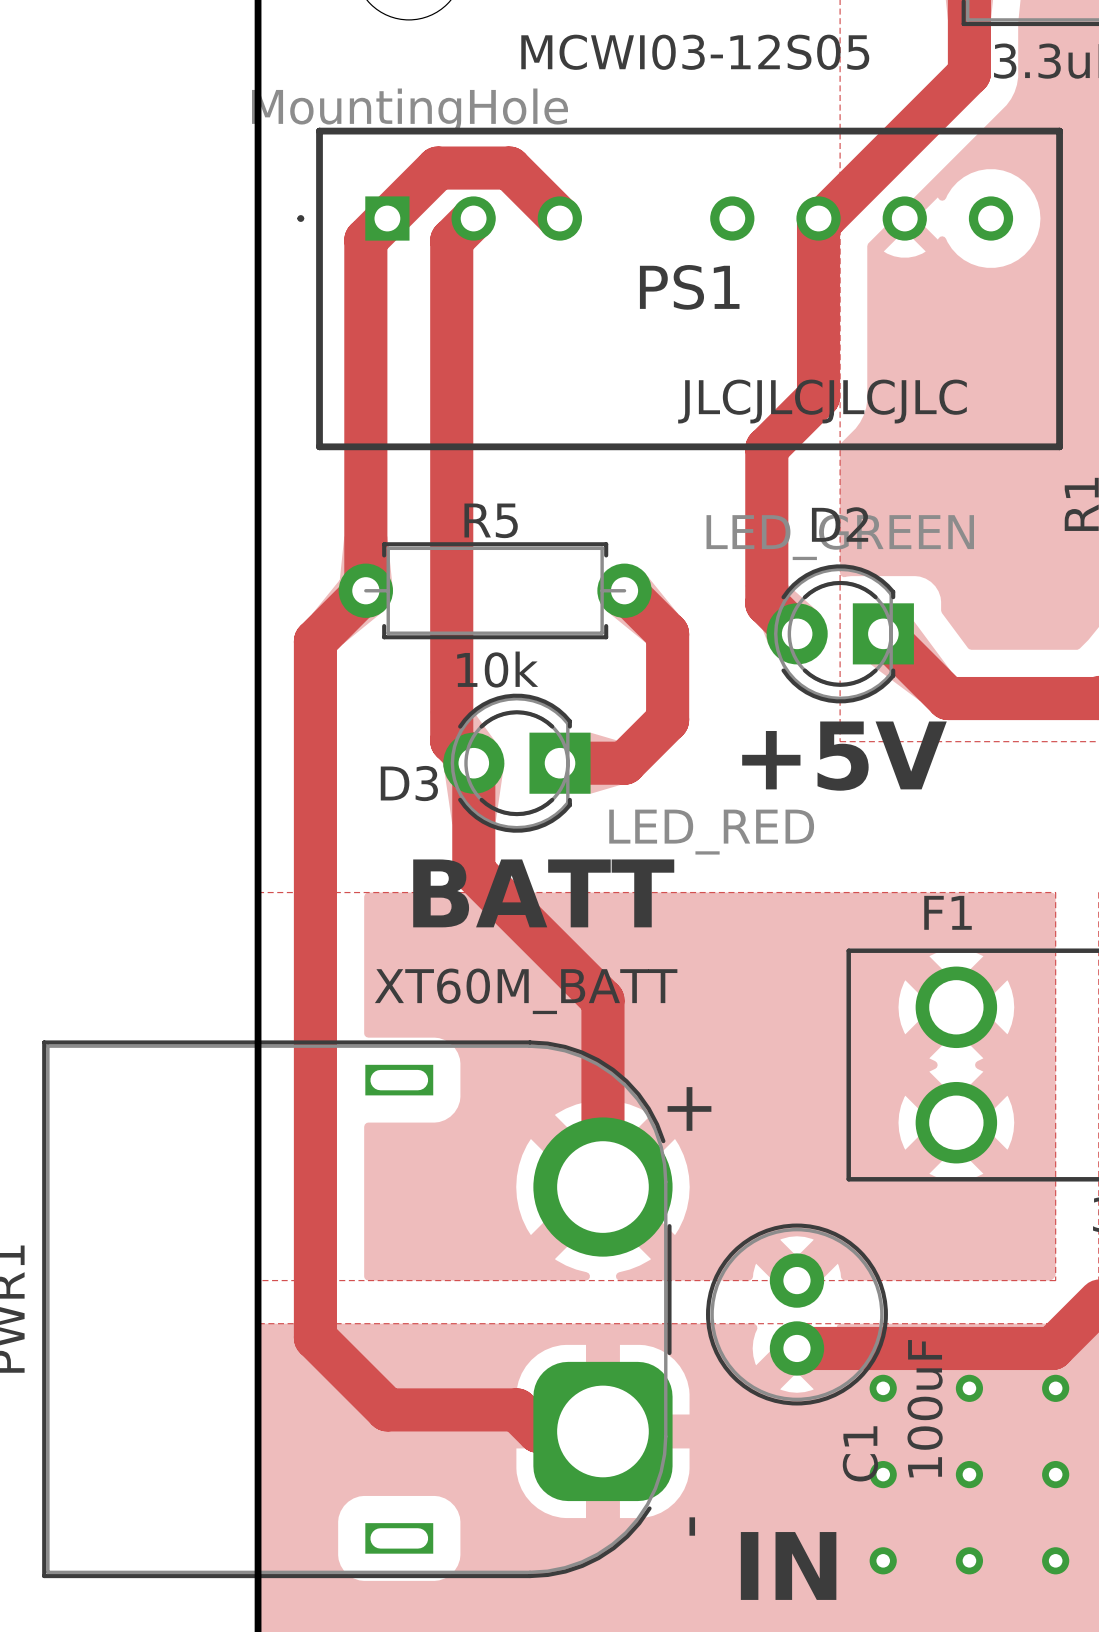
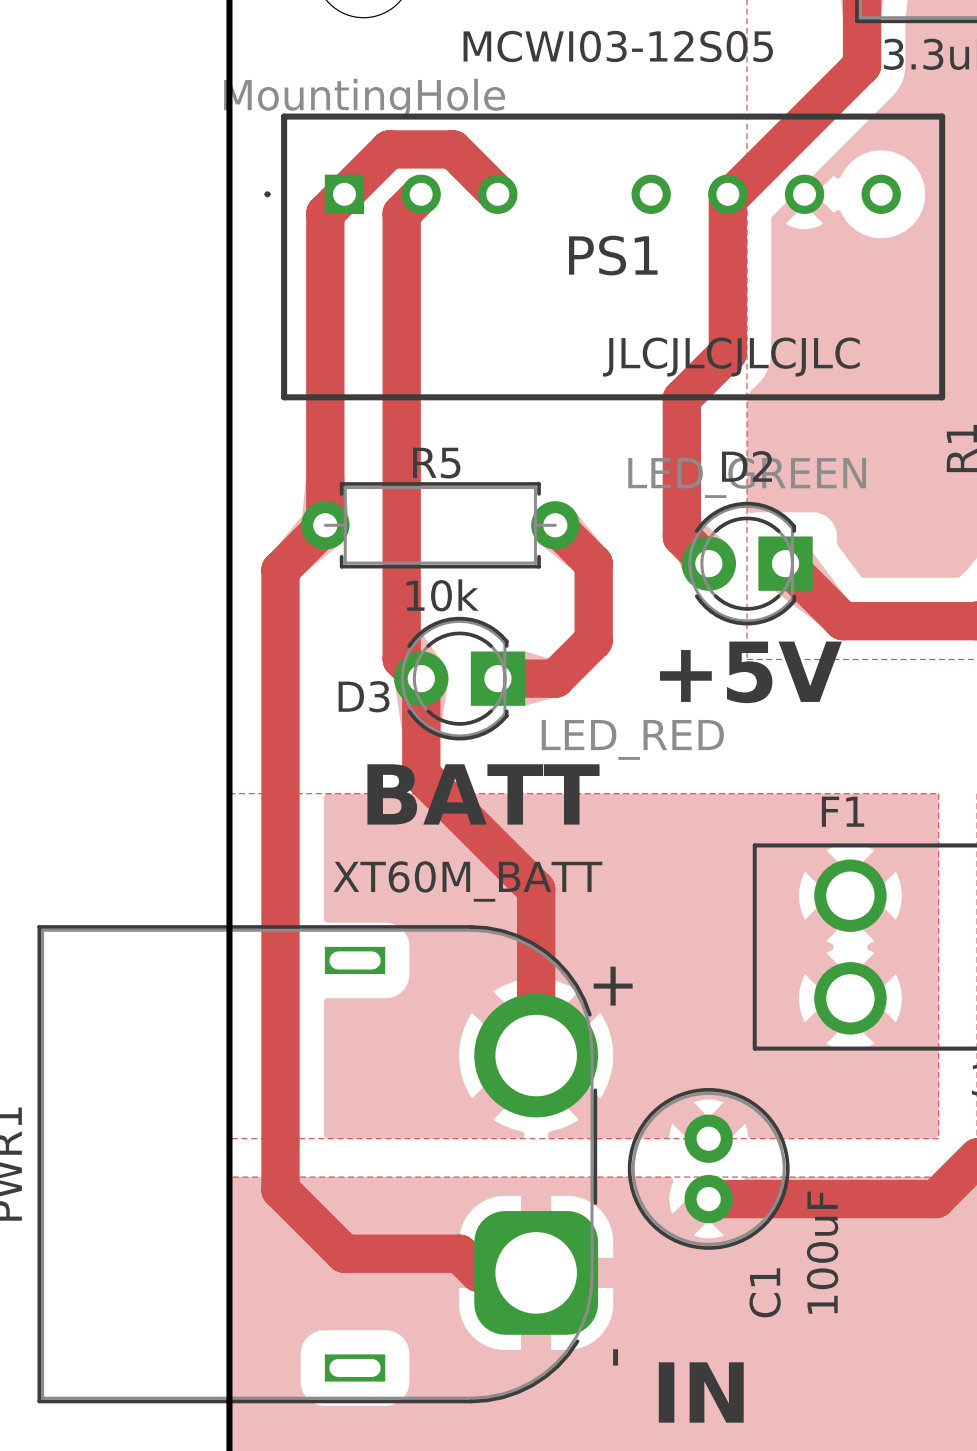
via: (883, 1388) -> none
via: (969, 1388) -> none
via: (1055, 1388) -> none
via: (883, 1474) -> none
via: (969, 1474) -> none
via: (1055, 1474) -> none
via: (883, 1560) -> none
via: (969, 1560) -> none
via: (1055, 1560) -> none

